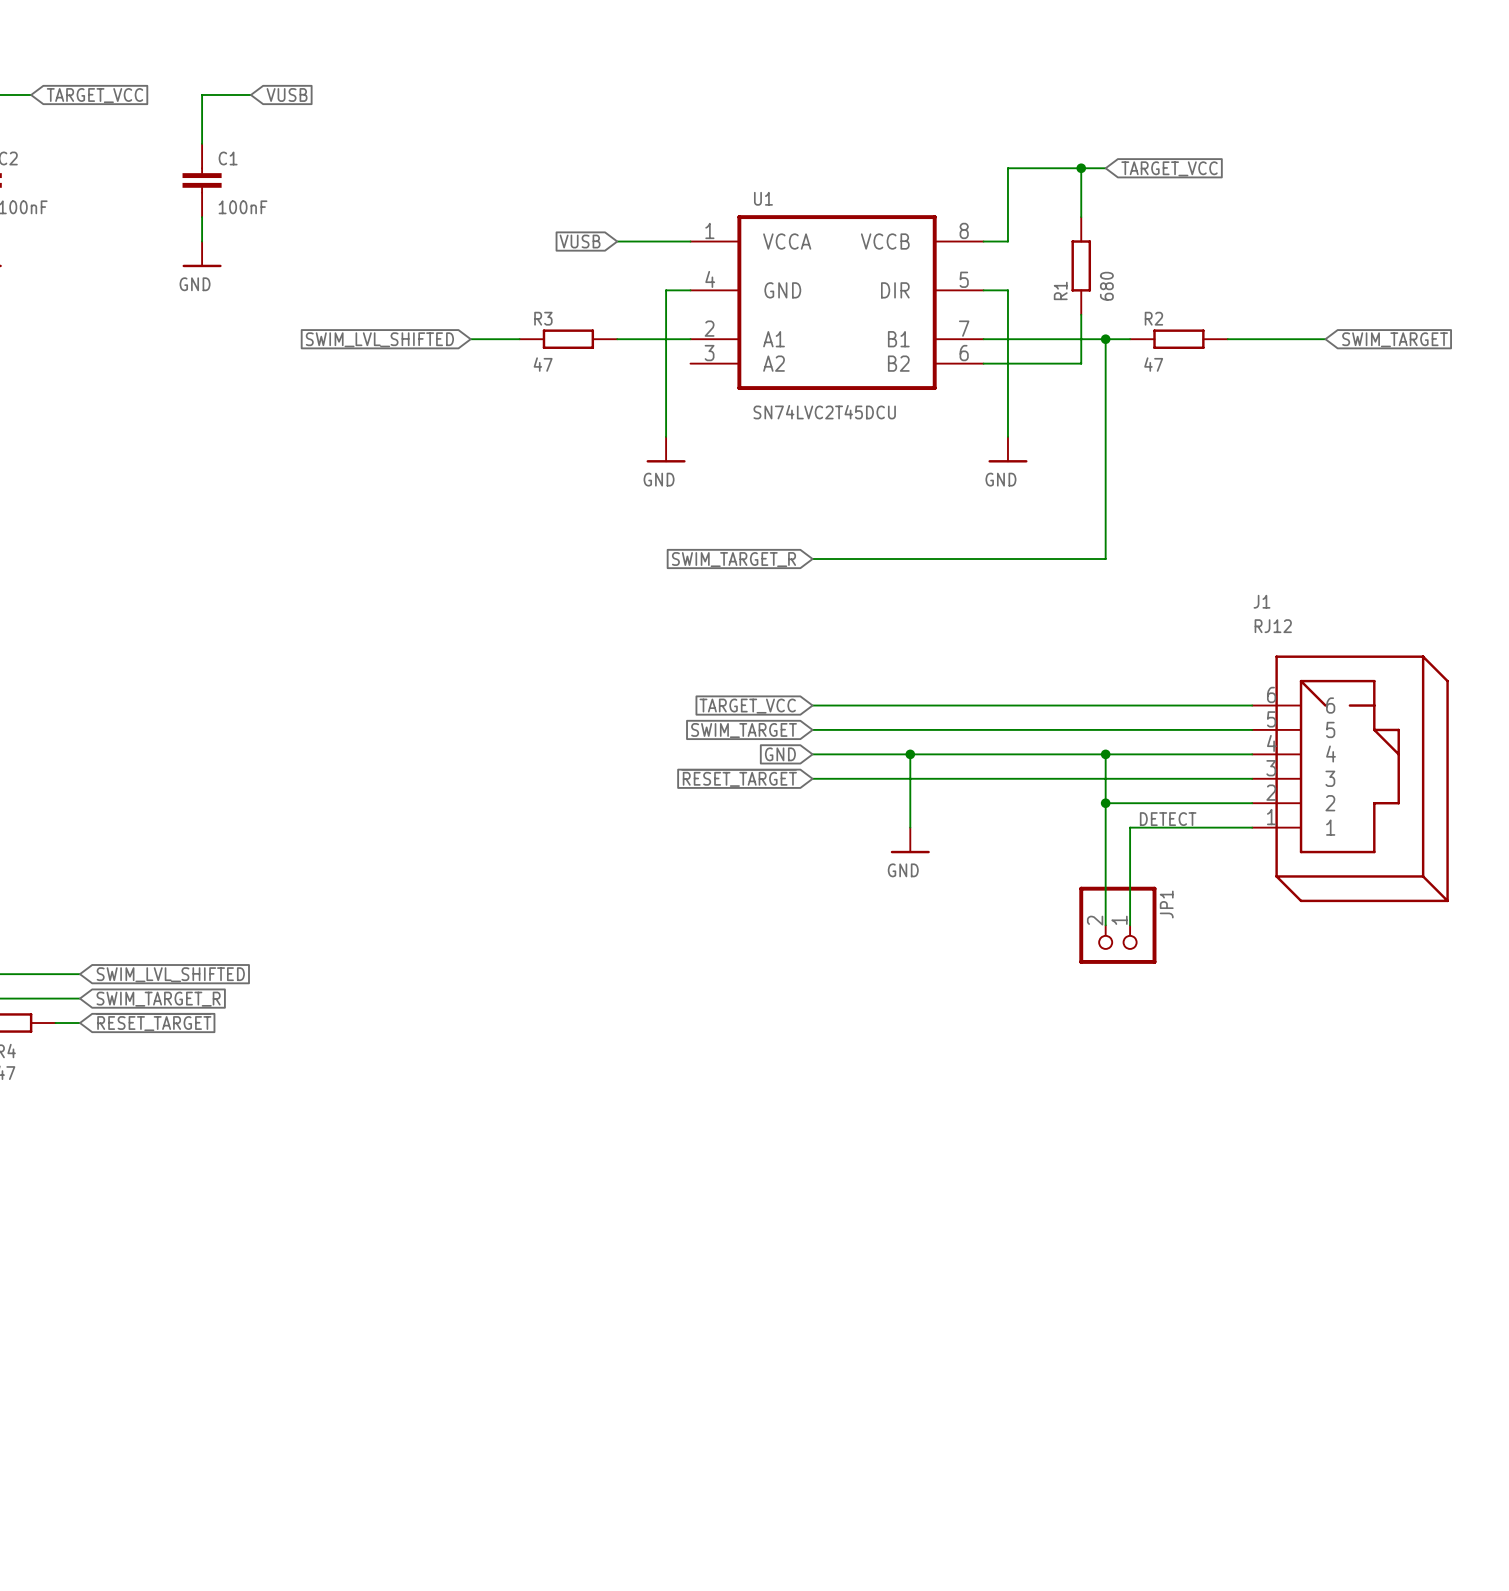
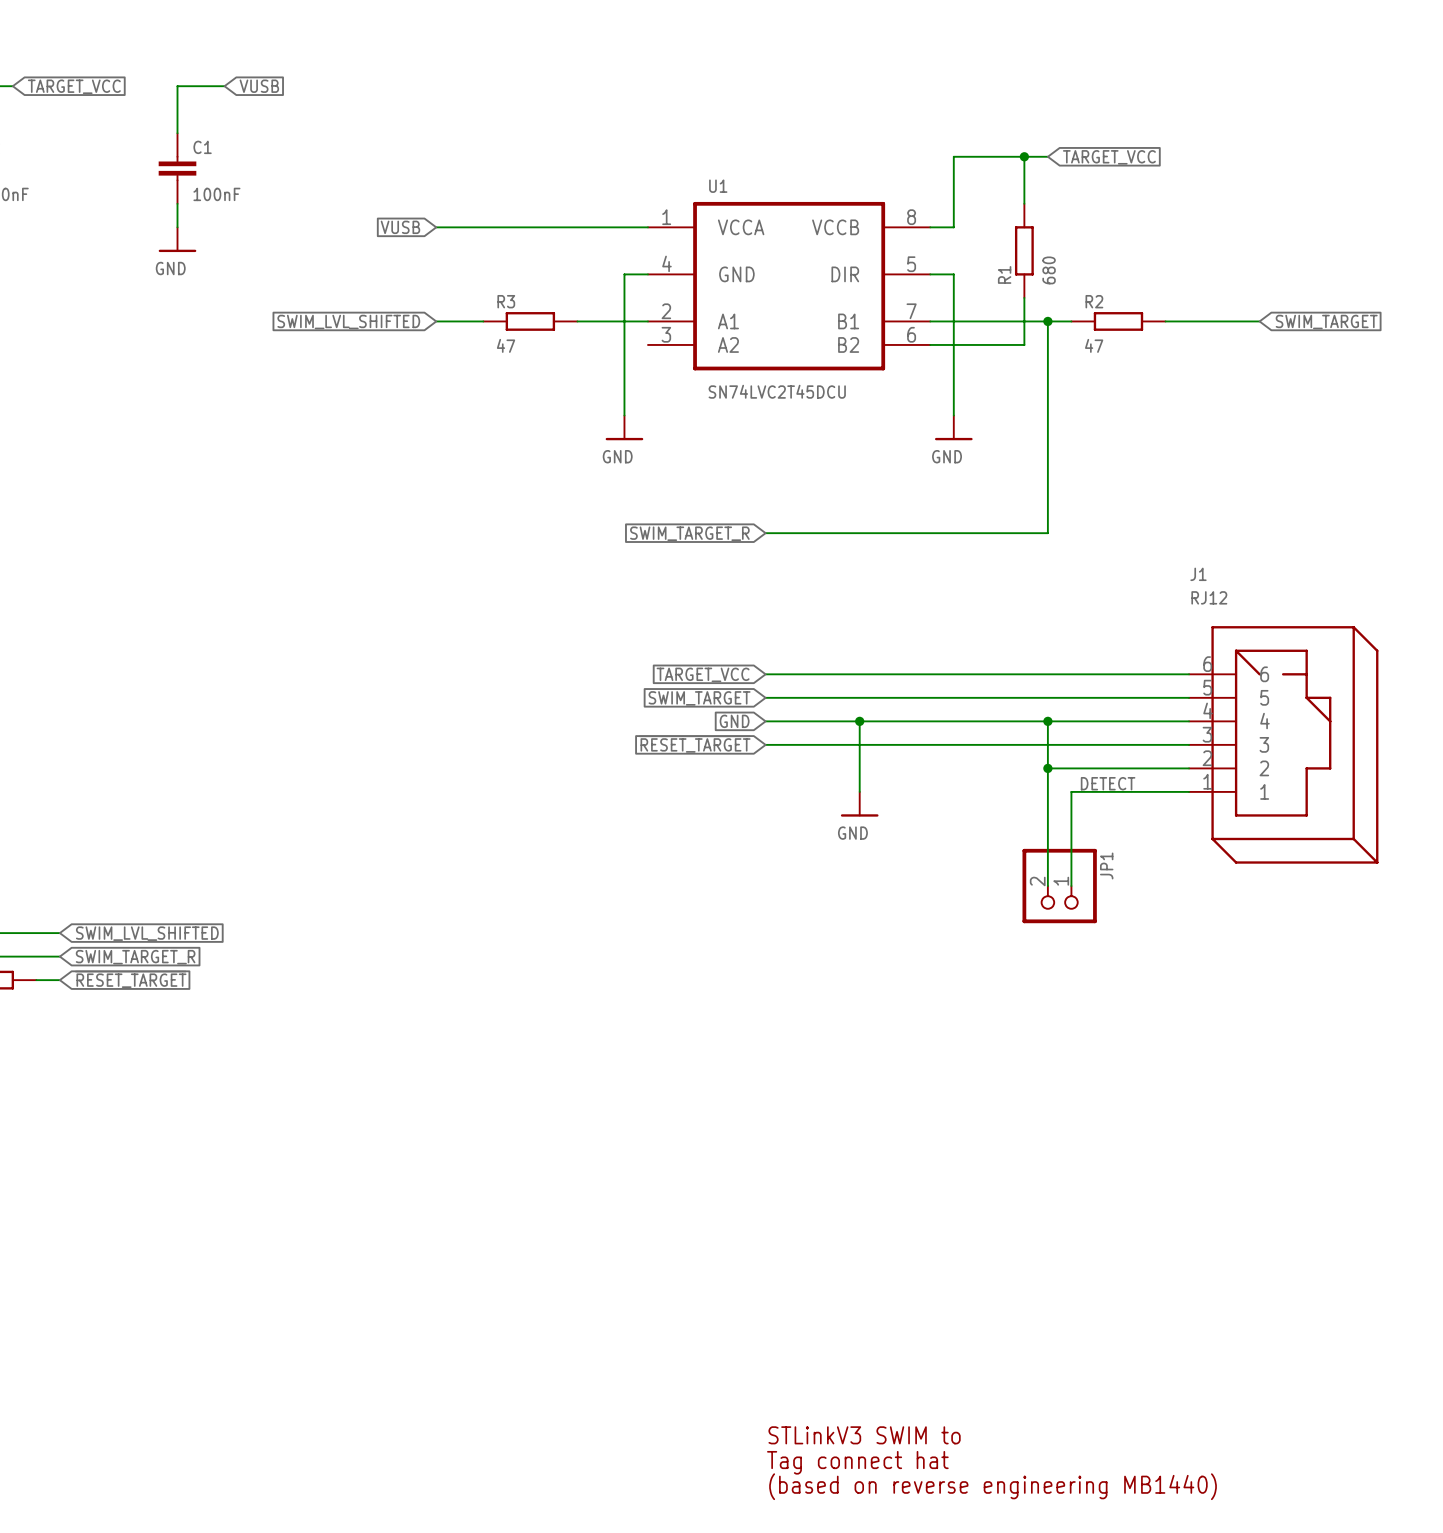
wire: none -> (436, 227) (577, 227)
global label position: VUSB (580, 241) -> VUSB (400, 227)
text: none -> STLinkV3 SWIM to (864, 1435)
text: none -> Tag connect hat (857, 1462)
text: none -> (based on reverse engineering MB1440) (993, 1486)

